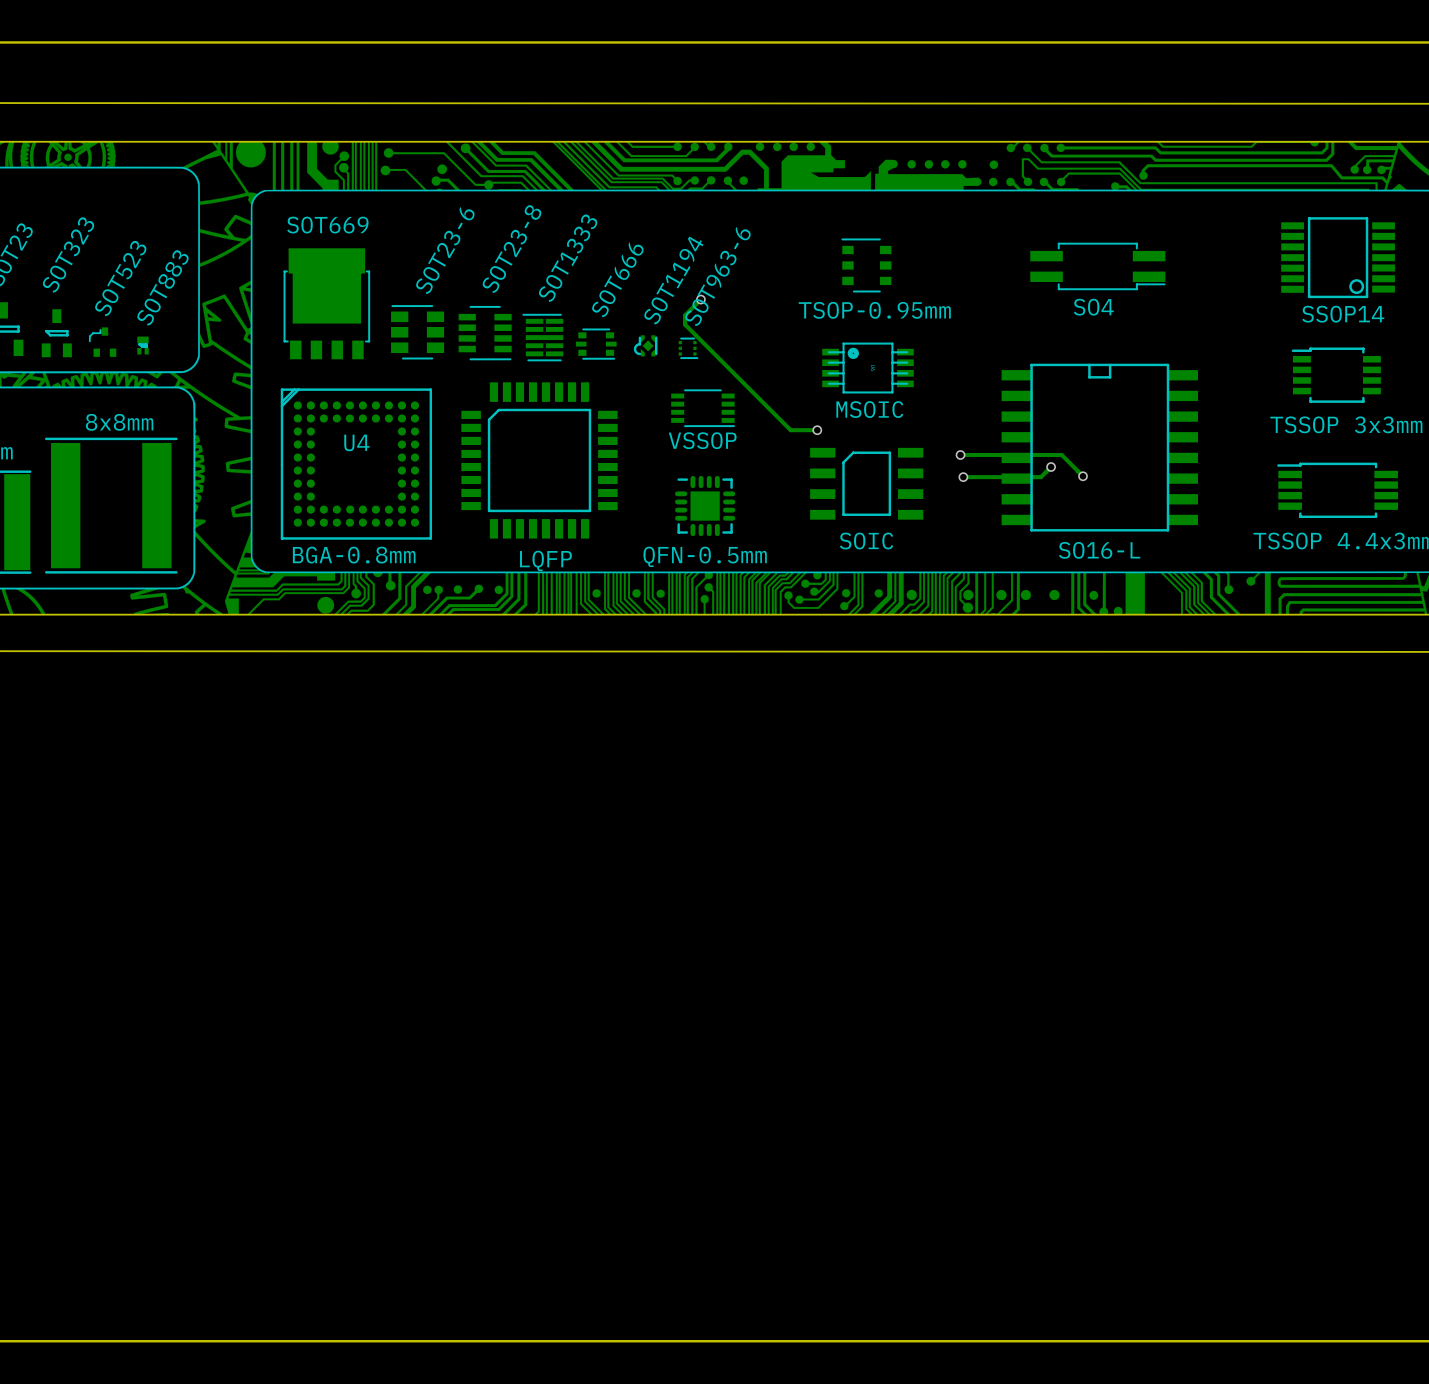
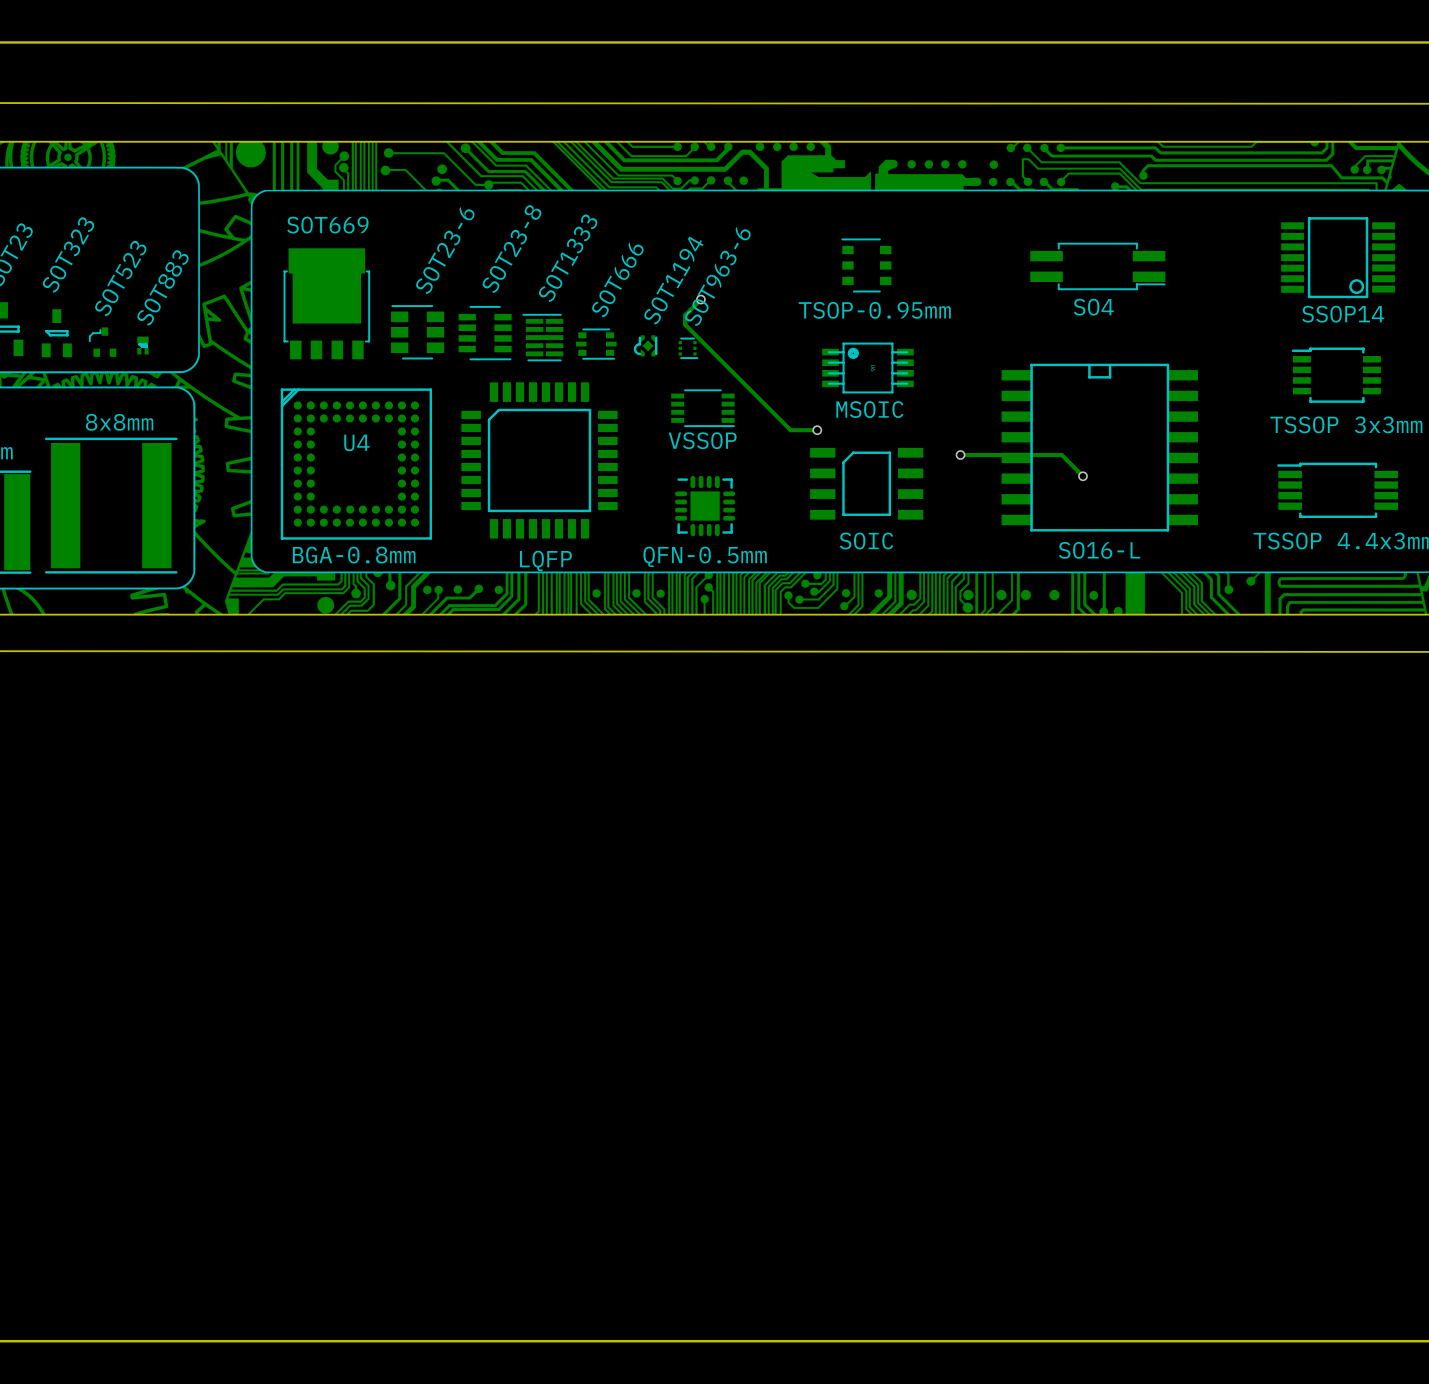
track: (1051, 467) (1040, 477) (963, 477) -> none
via: (1051, 467) -> none
via: (963, 477) -> none

